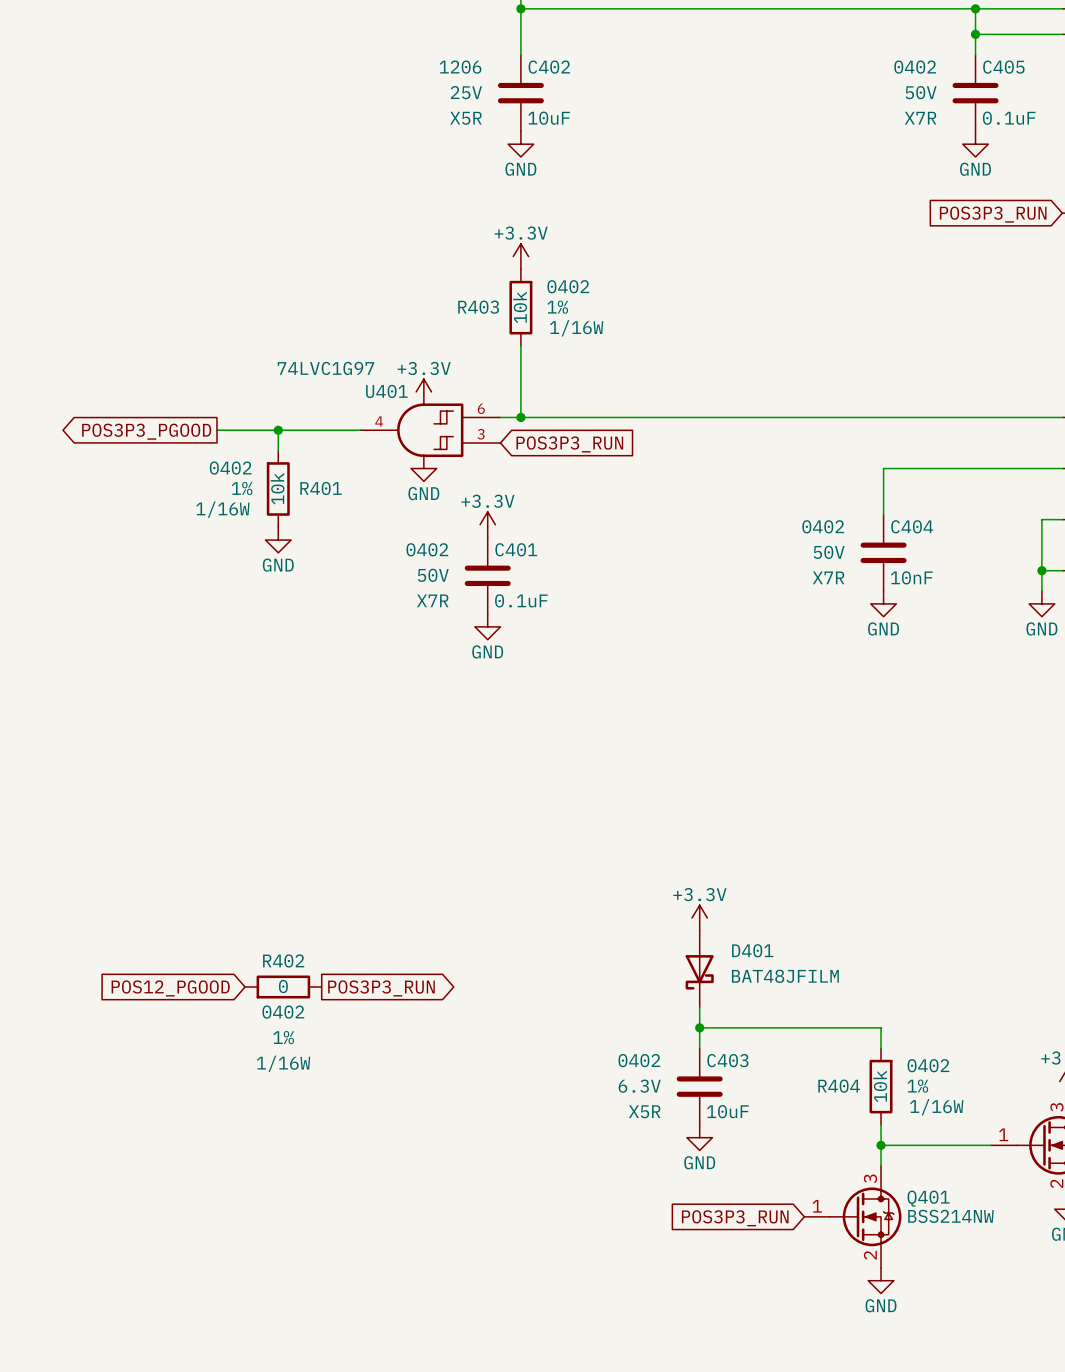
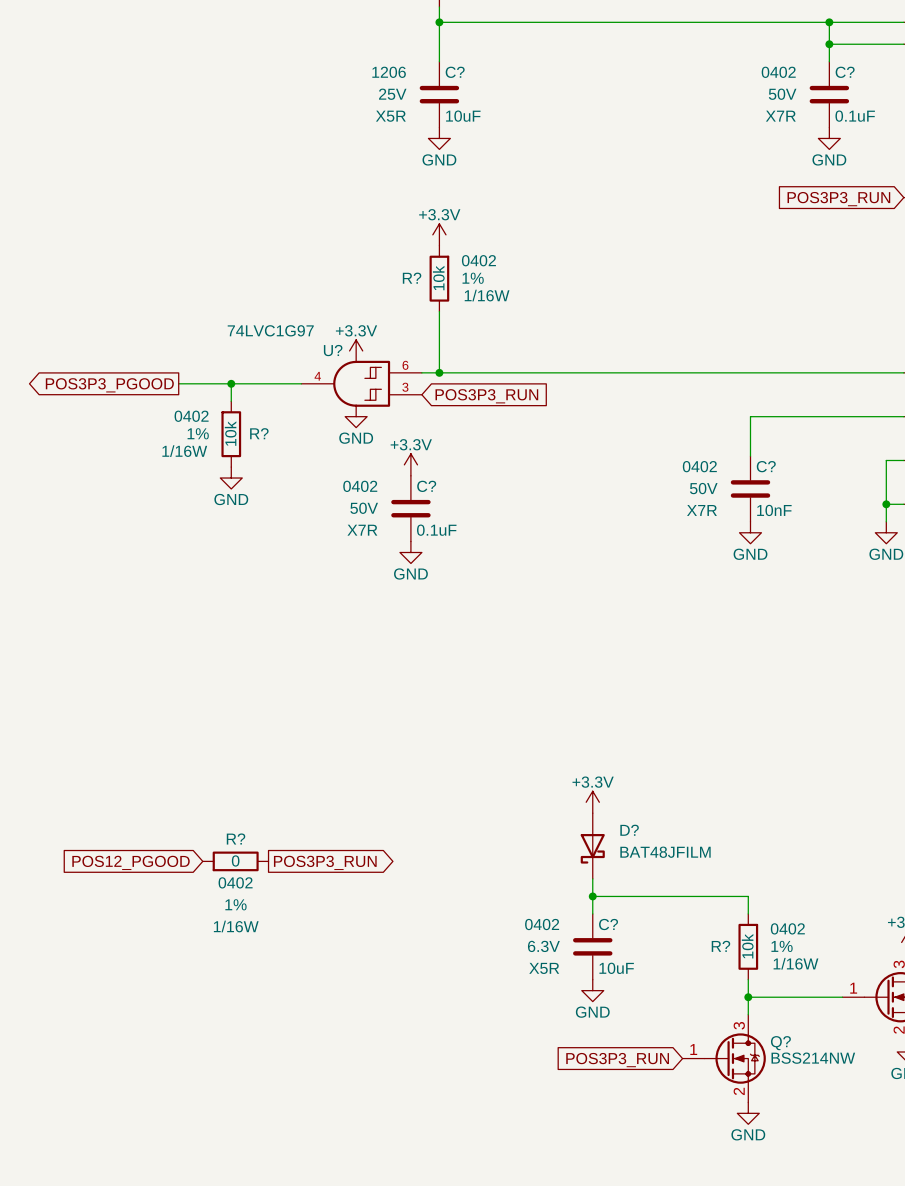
C402 name: C402 (549, 67) -> C? (455, 72)
C405 name: C405 (1003, 67) -> C? (845, 72)
R403 name: R403 (478, 307) -> R? (412, 278)
U401 name: U401 (386, 391) -> U? (333, 350)
R401 name: R401 (321, 488) -> R? (259, 433)
C404 name: C404 (912, 526) -> C? (766, 466)
C401 name: C401 (516, 549) -> C? (426, 486)
D401 name: D401 (752, 950) -> D? (629, 830)
R402 name: R402 (283, 960) -> R? (236, 838)
C403 name: C403 (727, 1060) -> C? (608, 924)
R404 name: R404 (839, 1086) -> R? (720, 946)
Q401 name: Q401 (928, 1198) -> Q? (780, 1043)

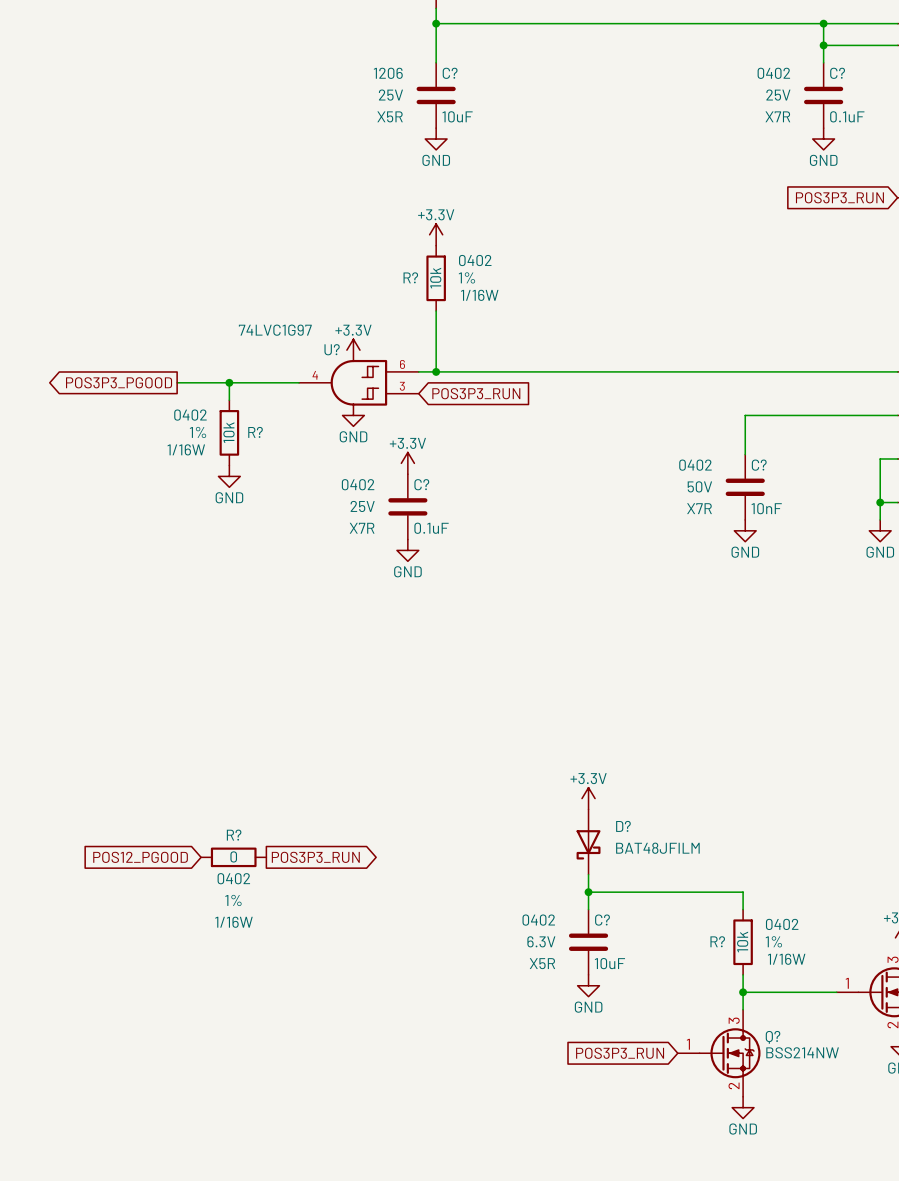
C? text: 50V (782, 94) -> 25V (778, 95)
C? text: 50V (364, 508) -> 25V (362, 506)

